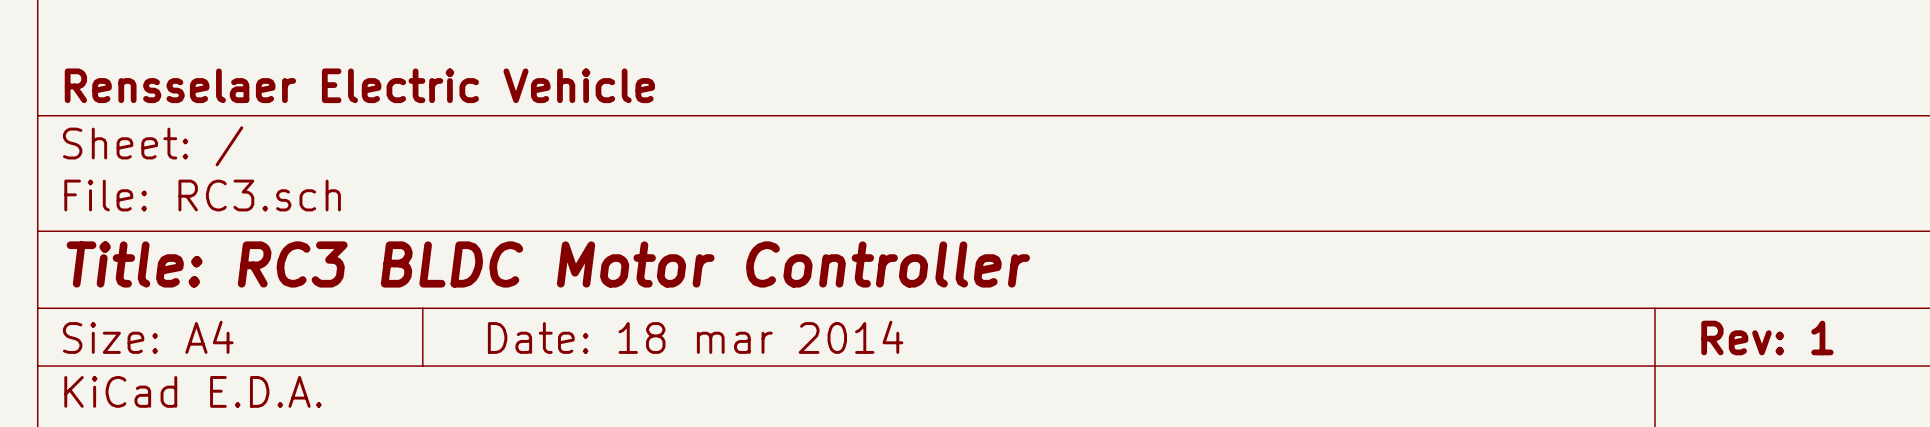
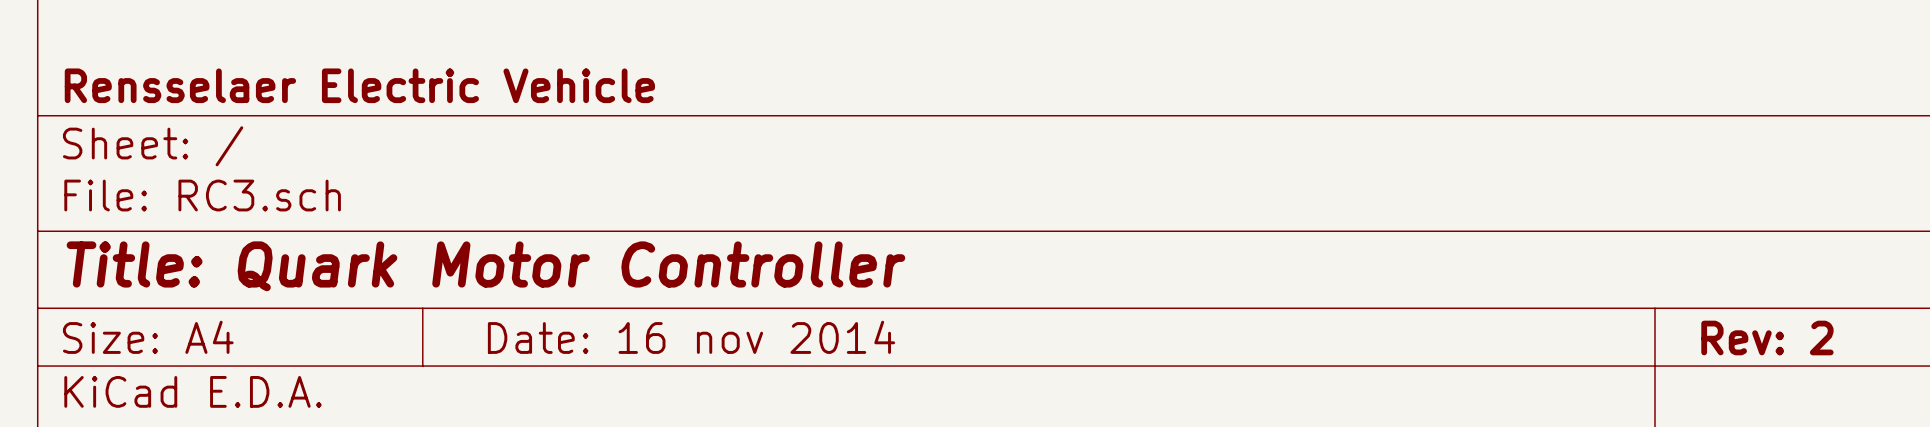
title block: Title: RC3 BLDC Motor Controller (548, 264) -> Title: Quark Motor Controller (485, 266)
title block: Date: 18 mar 2014 (695, 337) -> Date: 16 nov 2014 (691, 337)
title block: Rev: 1 (1767, 337) -> Rev: 2 (1767, 337)

